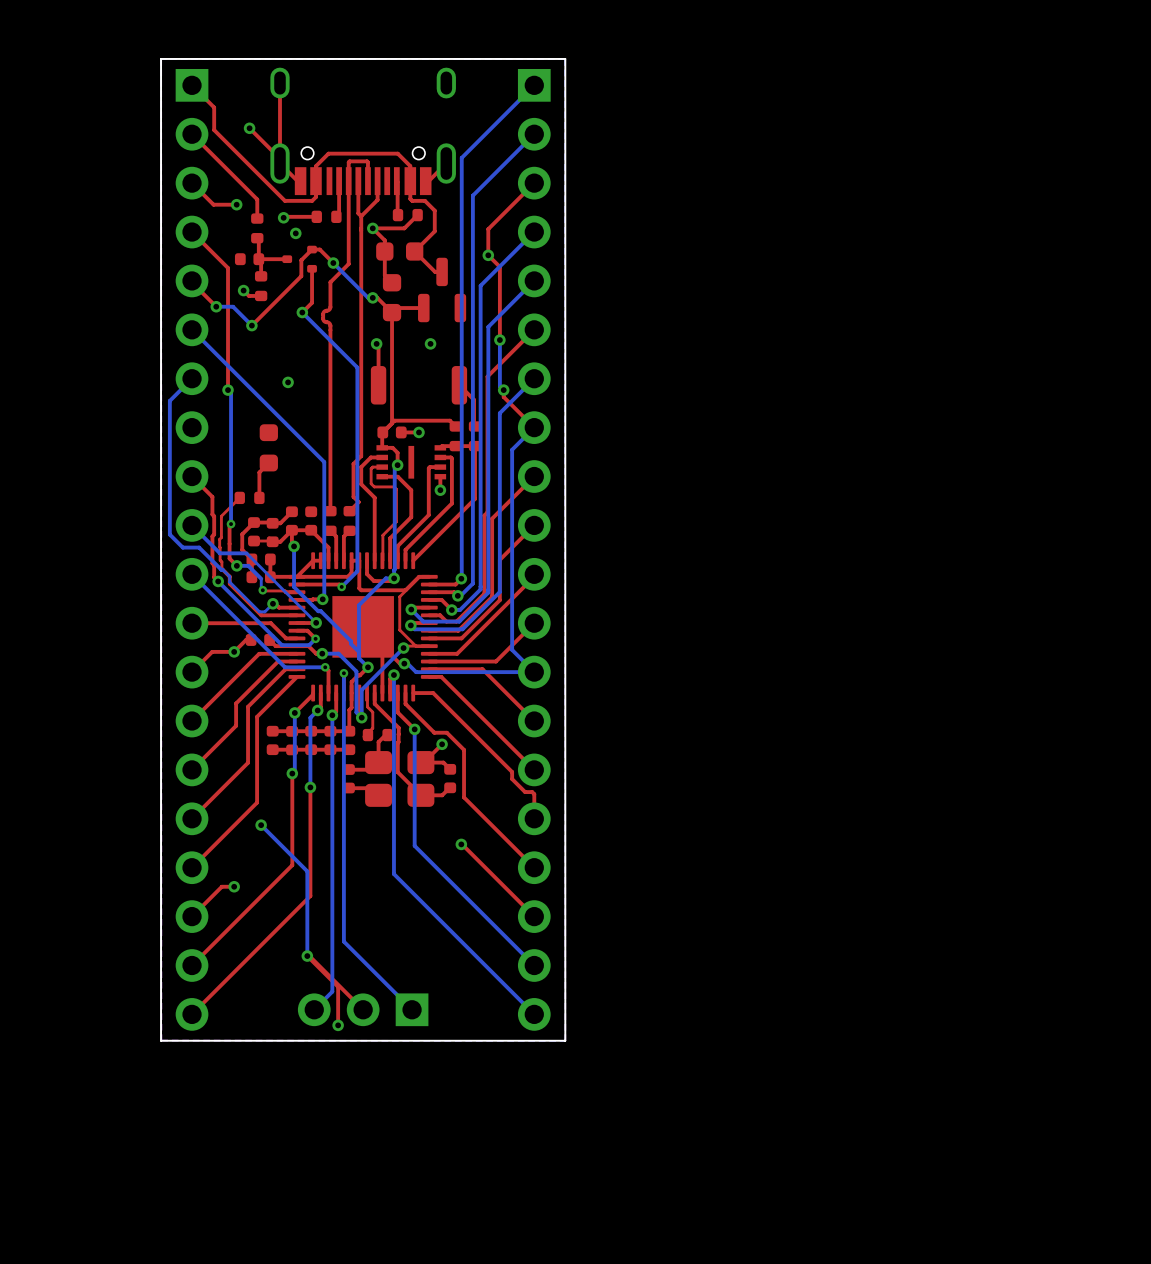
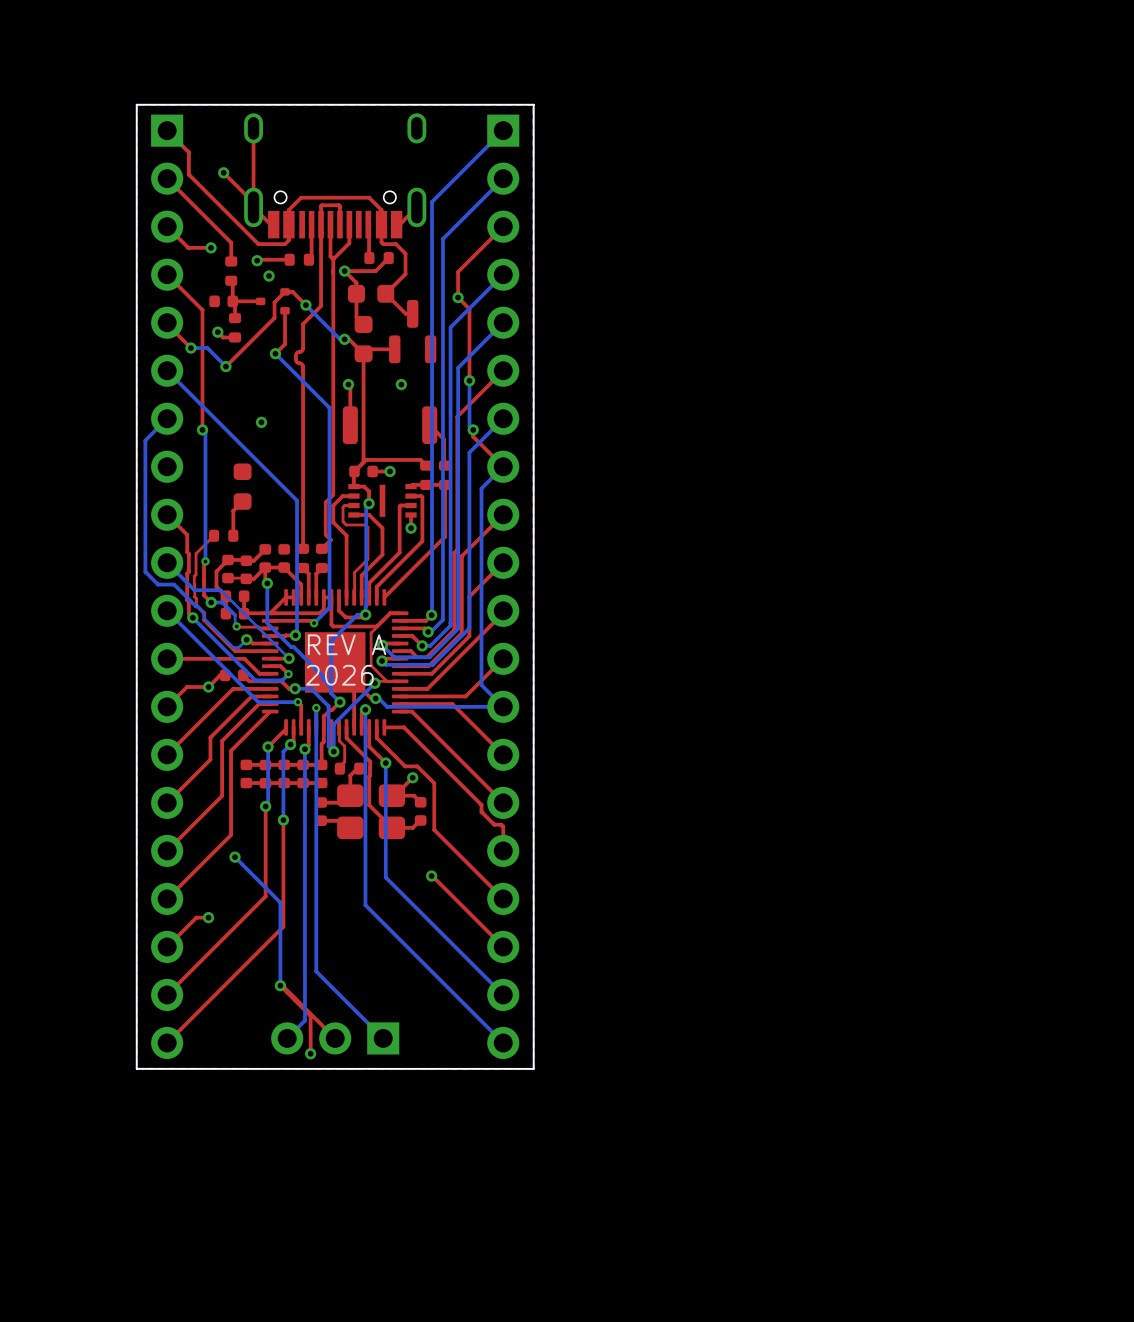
text: none -> REV A (347, 644)
text: none -> 2026 (339, 675)

